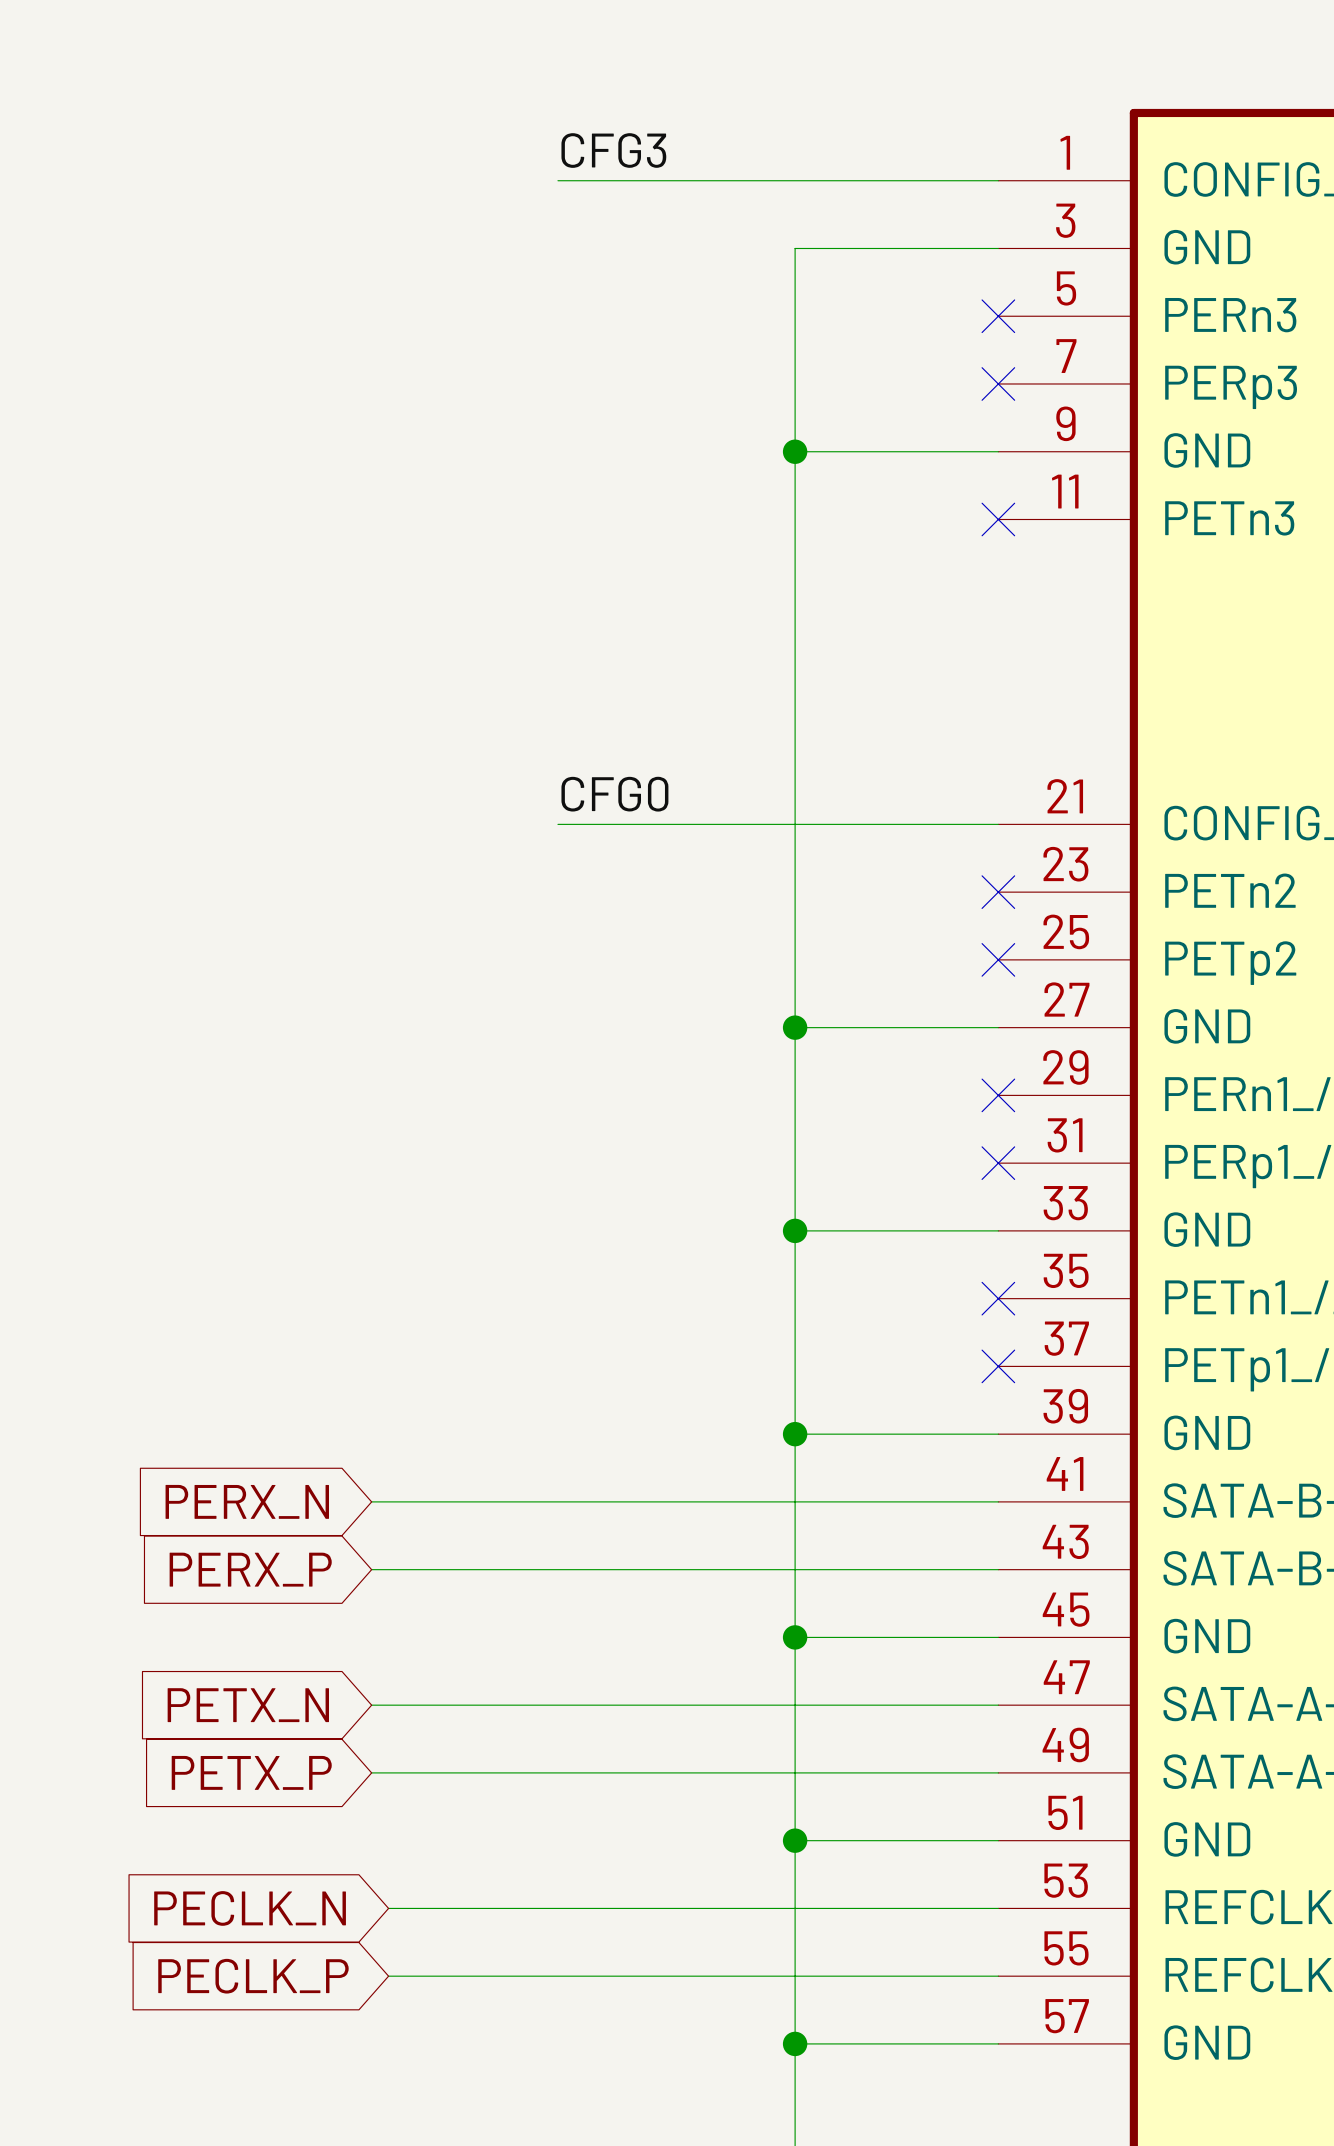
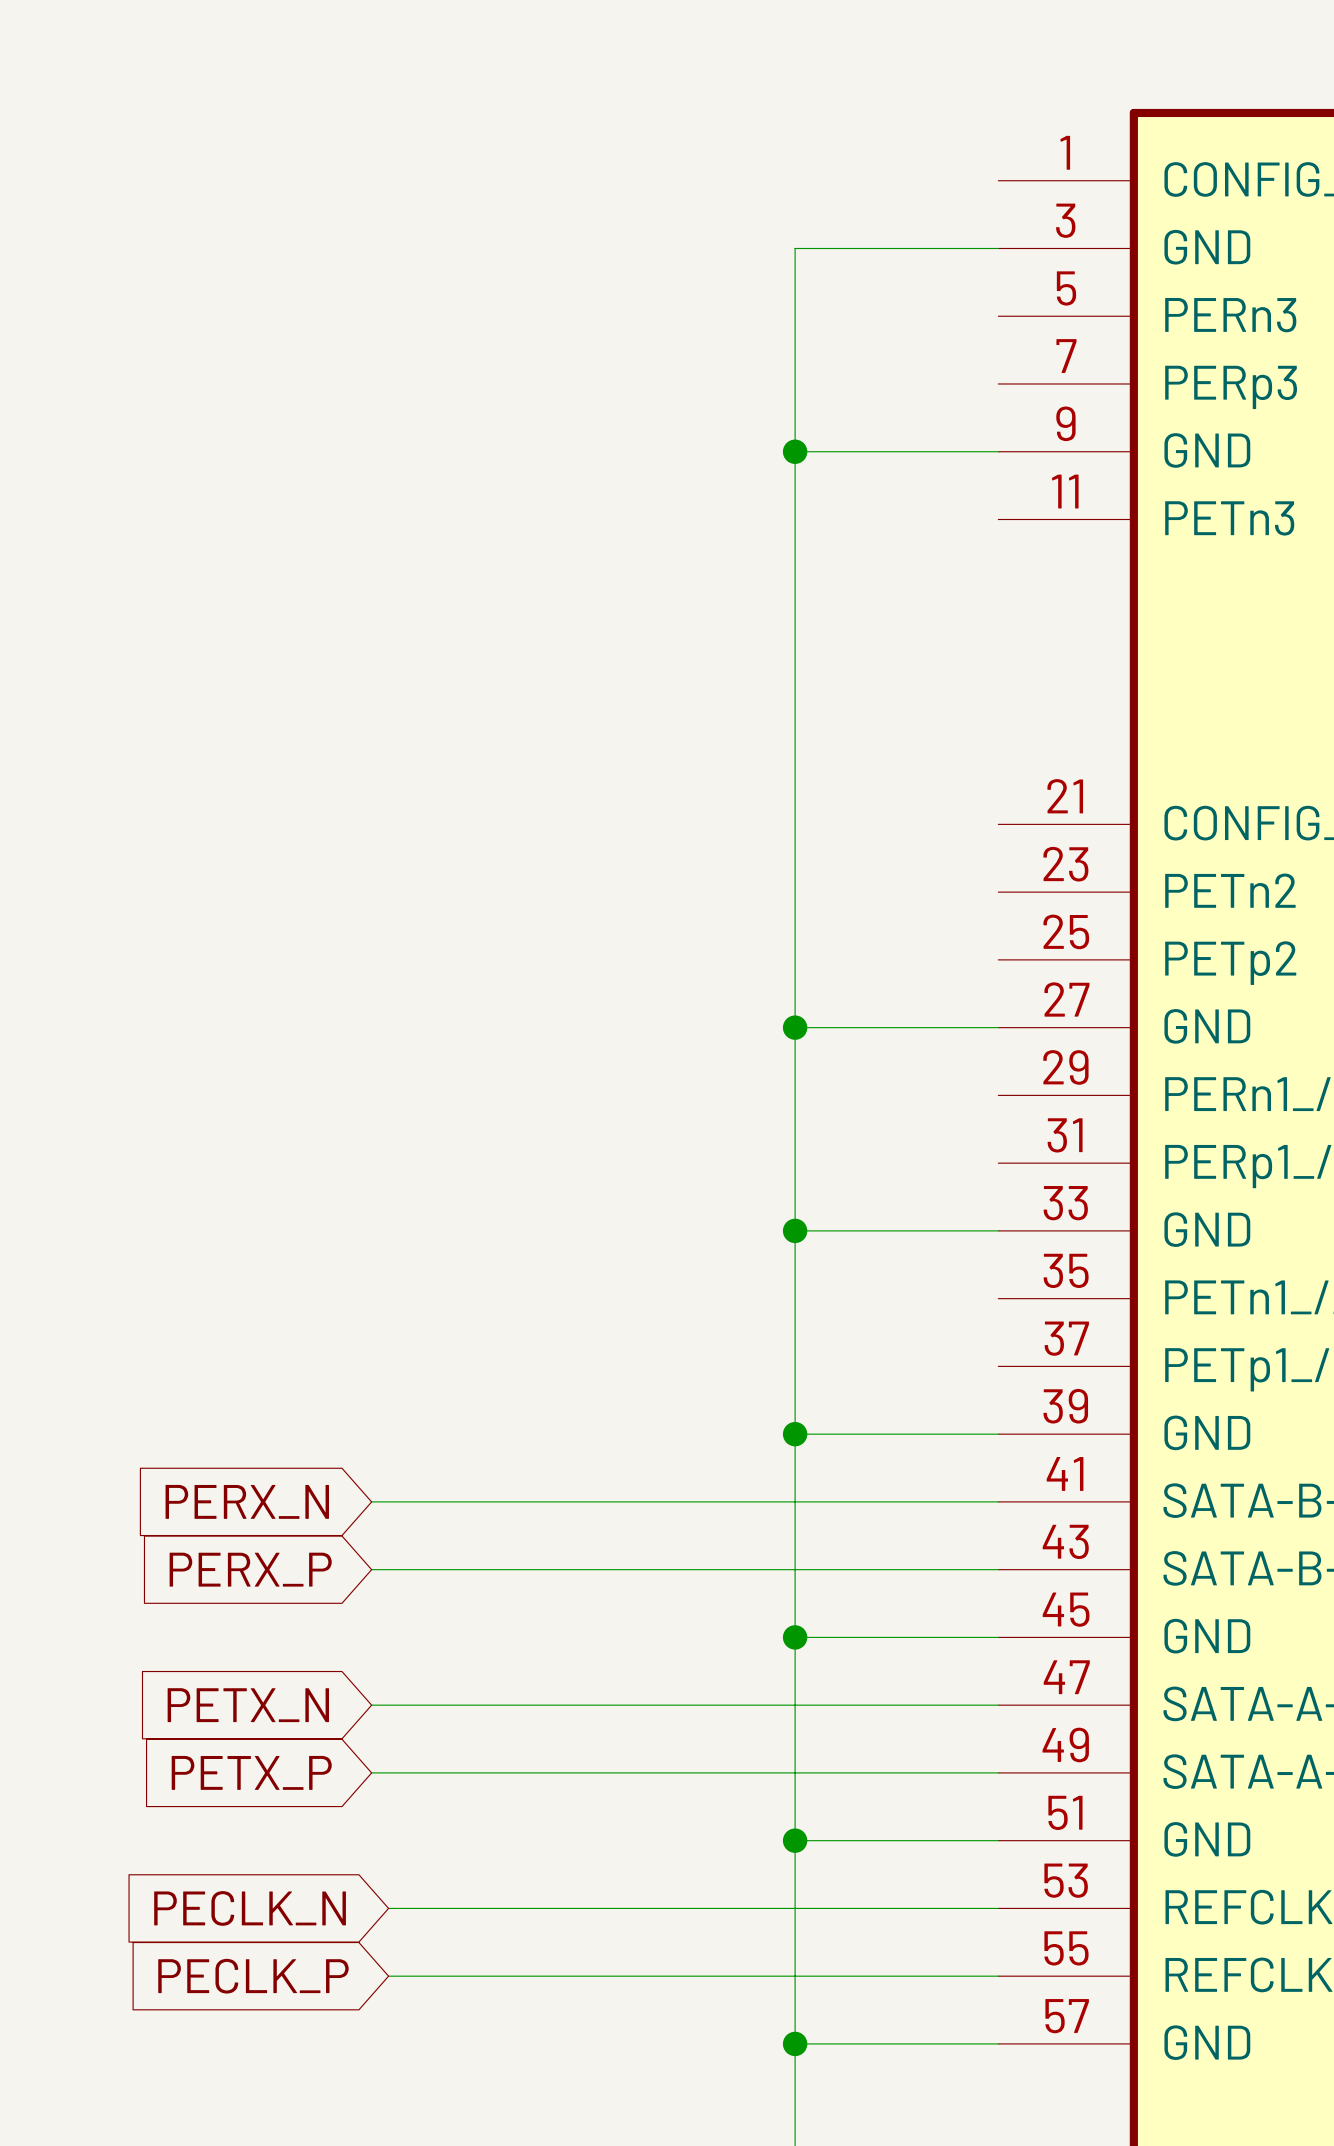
label: CFG3 (613, 150) -> none
wire: (557, 180) (998, 180) -> none
no-connect mark: (998, 316) -> none
no-connect mark: (998, 383) -> none
no-connect mark: (998, 519) -> none
label: CFG0 (614, 794) -> none
wire: (557, 824) (998, 824) -> none
no-connect mark: (998, 892) -> none
no-connect mark: (998, 959) -> none
no-connect mark: (998, 1095) -> none
no-connect mark: (998, 1163) -> none
no-connect mark: (998, 1298) -> none
no-connect mark: (998, 1366) -> none

